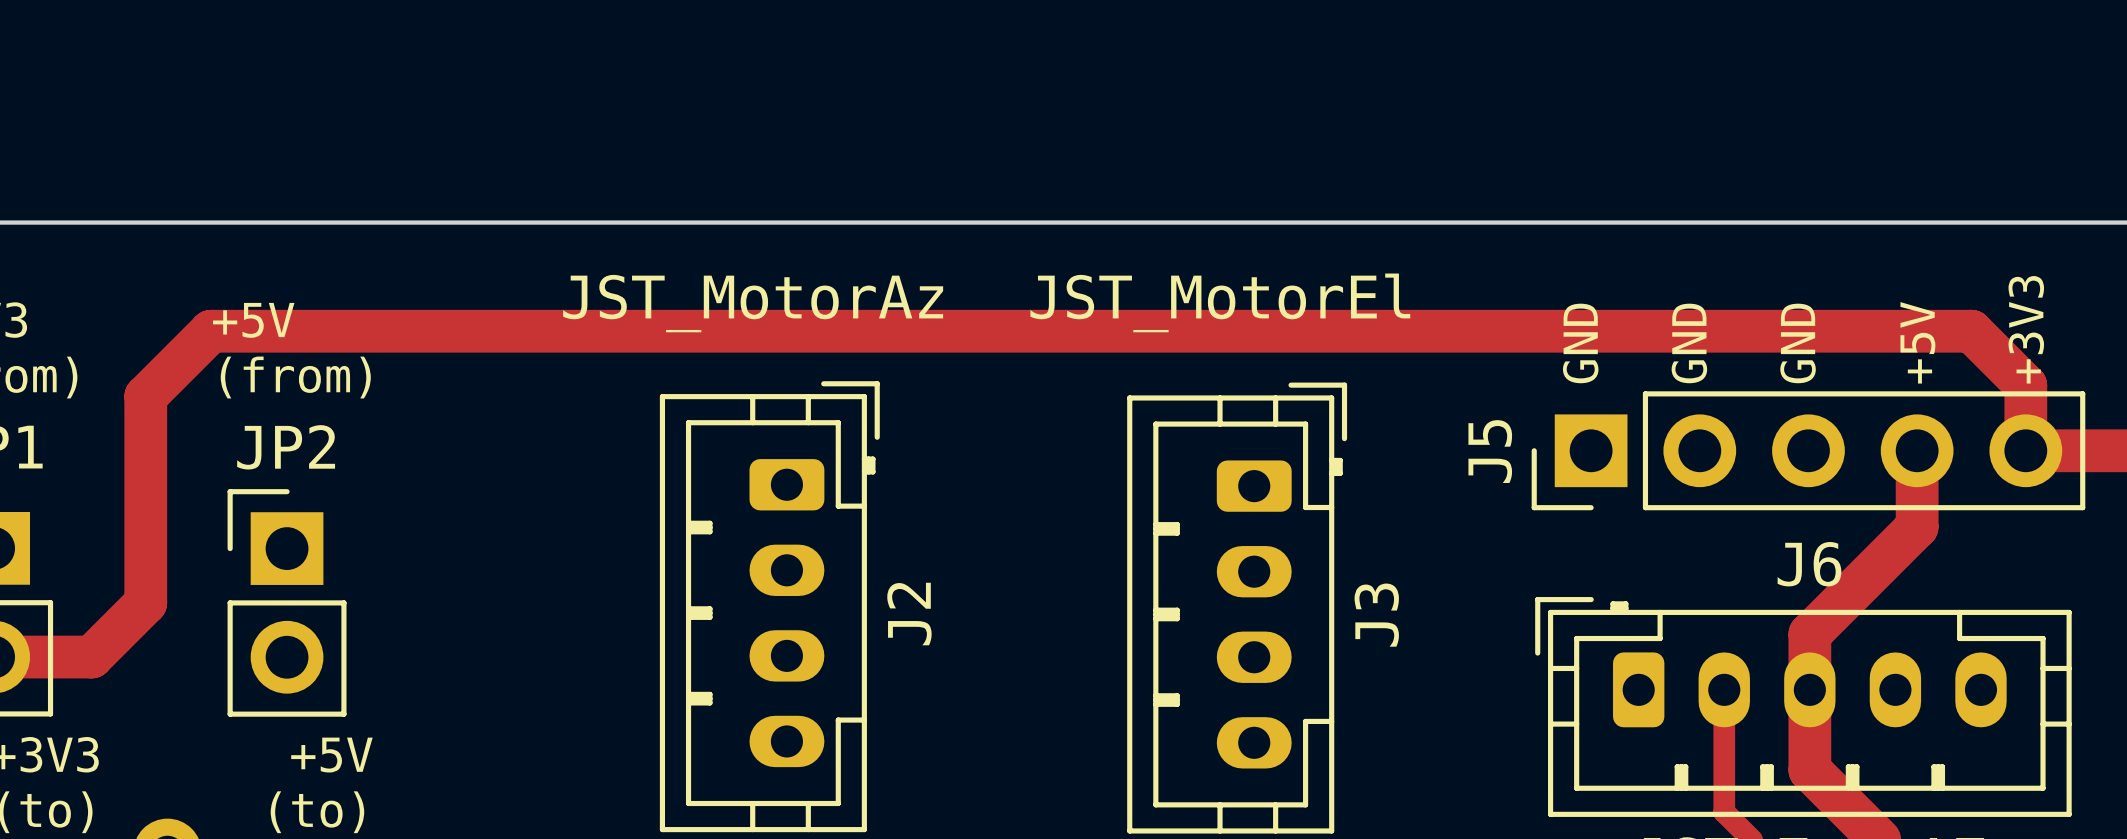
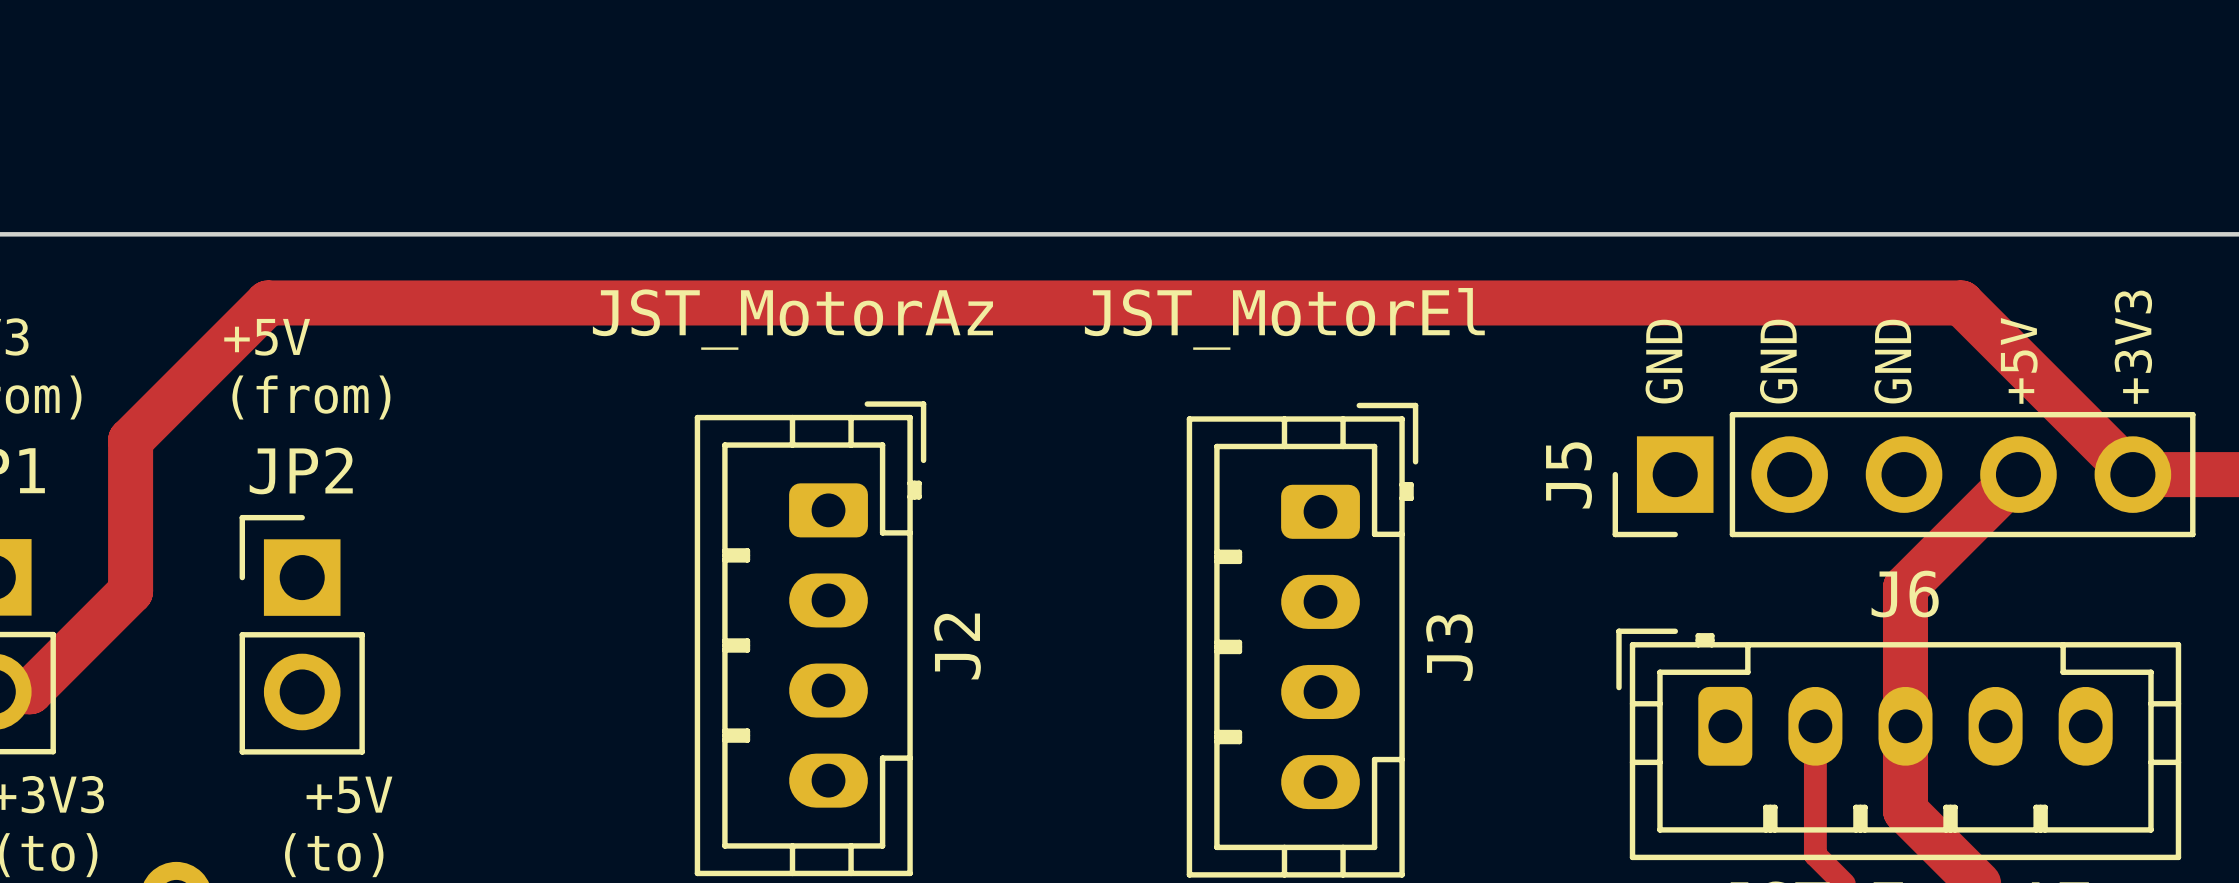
track: (210, 331) (1971, 331) (2025, 385) (2025, 450) -> (222, 348) (267, 302) (1961, 302) (2132, 474)
track: (145, 396) (145, 602) (91, 657) (28, 657) -> (153, 417) (130, 440) (130, 591) (30, 691)
track: (1917, 450) (1917, 526) (1809, 634) -> (2018, 474) (1905, 587) (1905, 667)

